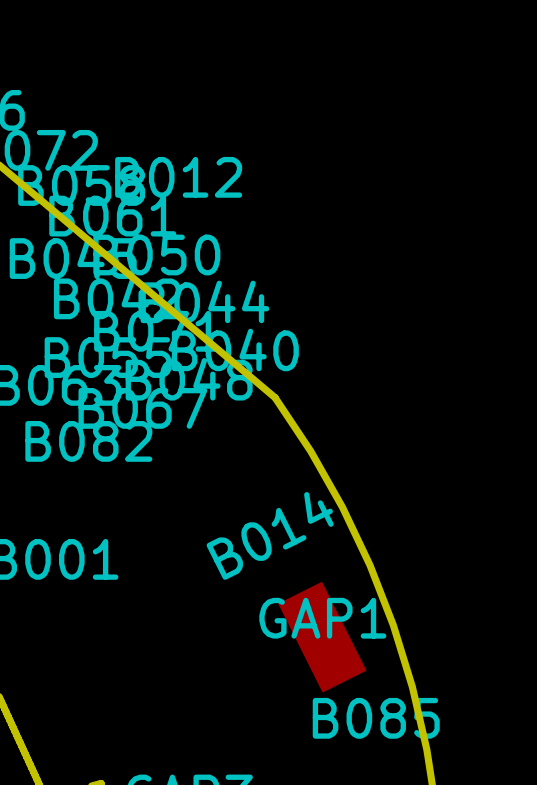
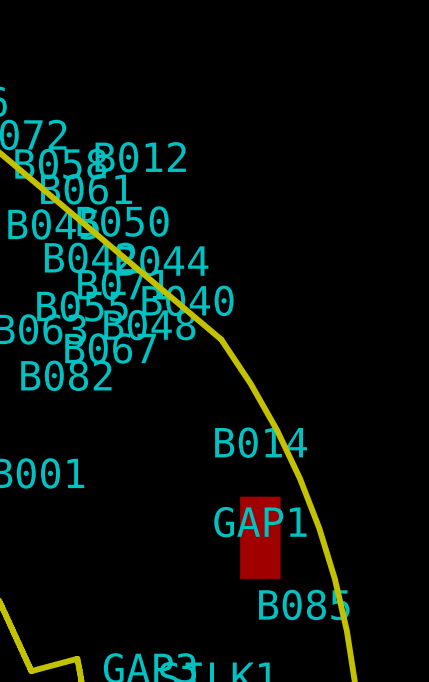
B014 rotation: 0° (322, 637) -> 26.6° clockwise (260, 537)

